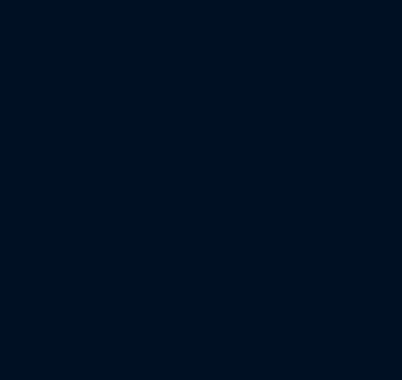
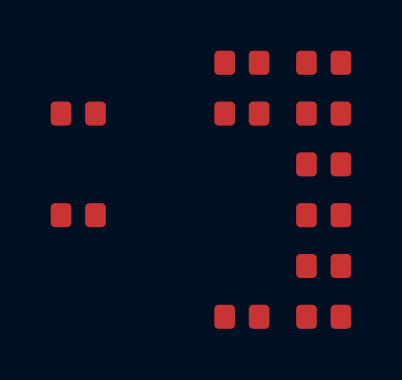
part: none -> (241, 62)
part: none -> (323, 62)
part: none -> (78, 113)
part: none -> (241, 113)
part: none -> (323, 113)
part: none -> (323, 164)
part: none -> (78, 215)
part: none -> (323, 215)
part: none -> (323, 265)
part: none -> (241, 316)
part: none -> (323, 316)

